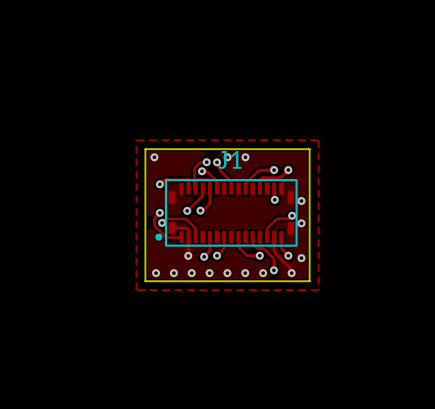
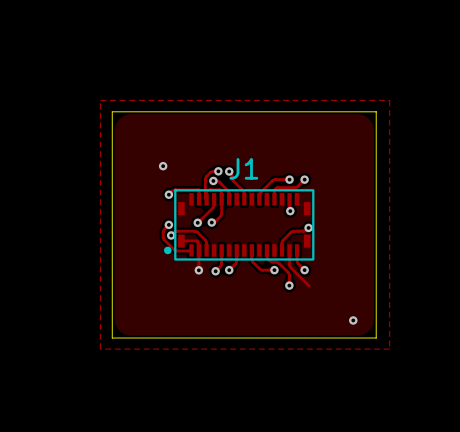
zone outline: none -> (100, 100) (389, 100) (389, 349) (100, 349) (100, 100)
board edge: none -> (112, 111) (376, 111) (376, 338) (112, 338) (112, 111)
zone outline: (136, 140) (318, 140) (318, 290) (136, 290) (136, 140) -> none
board edge: (145, 149) (309, 149) (309, 281) (145, 281) (145, 149) -> none
via: (227, 157) -> none
via: (245, 157) -> none
via: (301, 201) -> none
via: (301, 223) -> none
via: (301, 258) -> none
via: (156, 273) -> none
via: (173, 273) -> none
via: (191, 273) -> none
via: (209, 273) -> none
via: (227, 273) -> none
via: (245, 273) -> none
via: (263, 273) -> none
via: (291, 273) -> none
via: none -> (353, 320)

